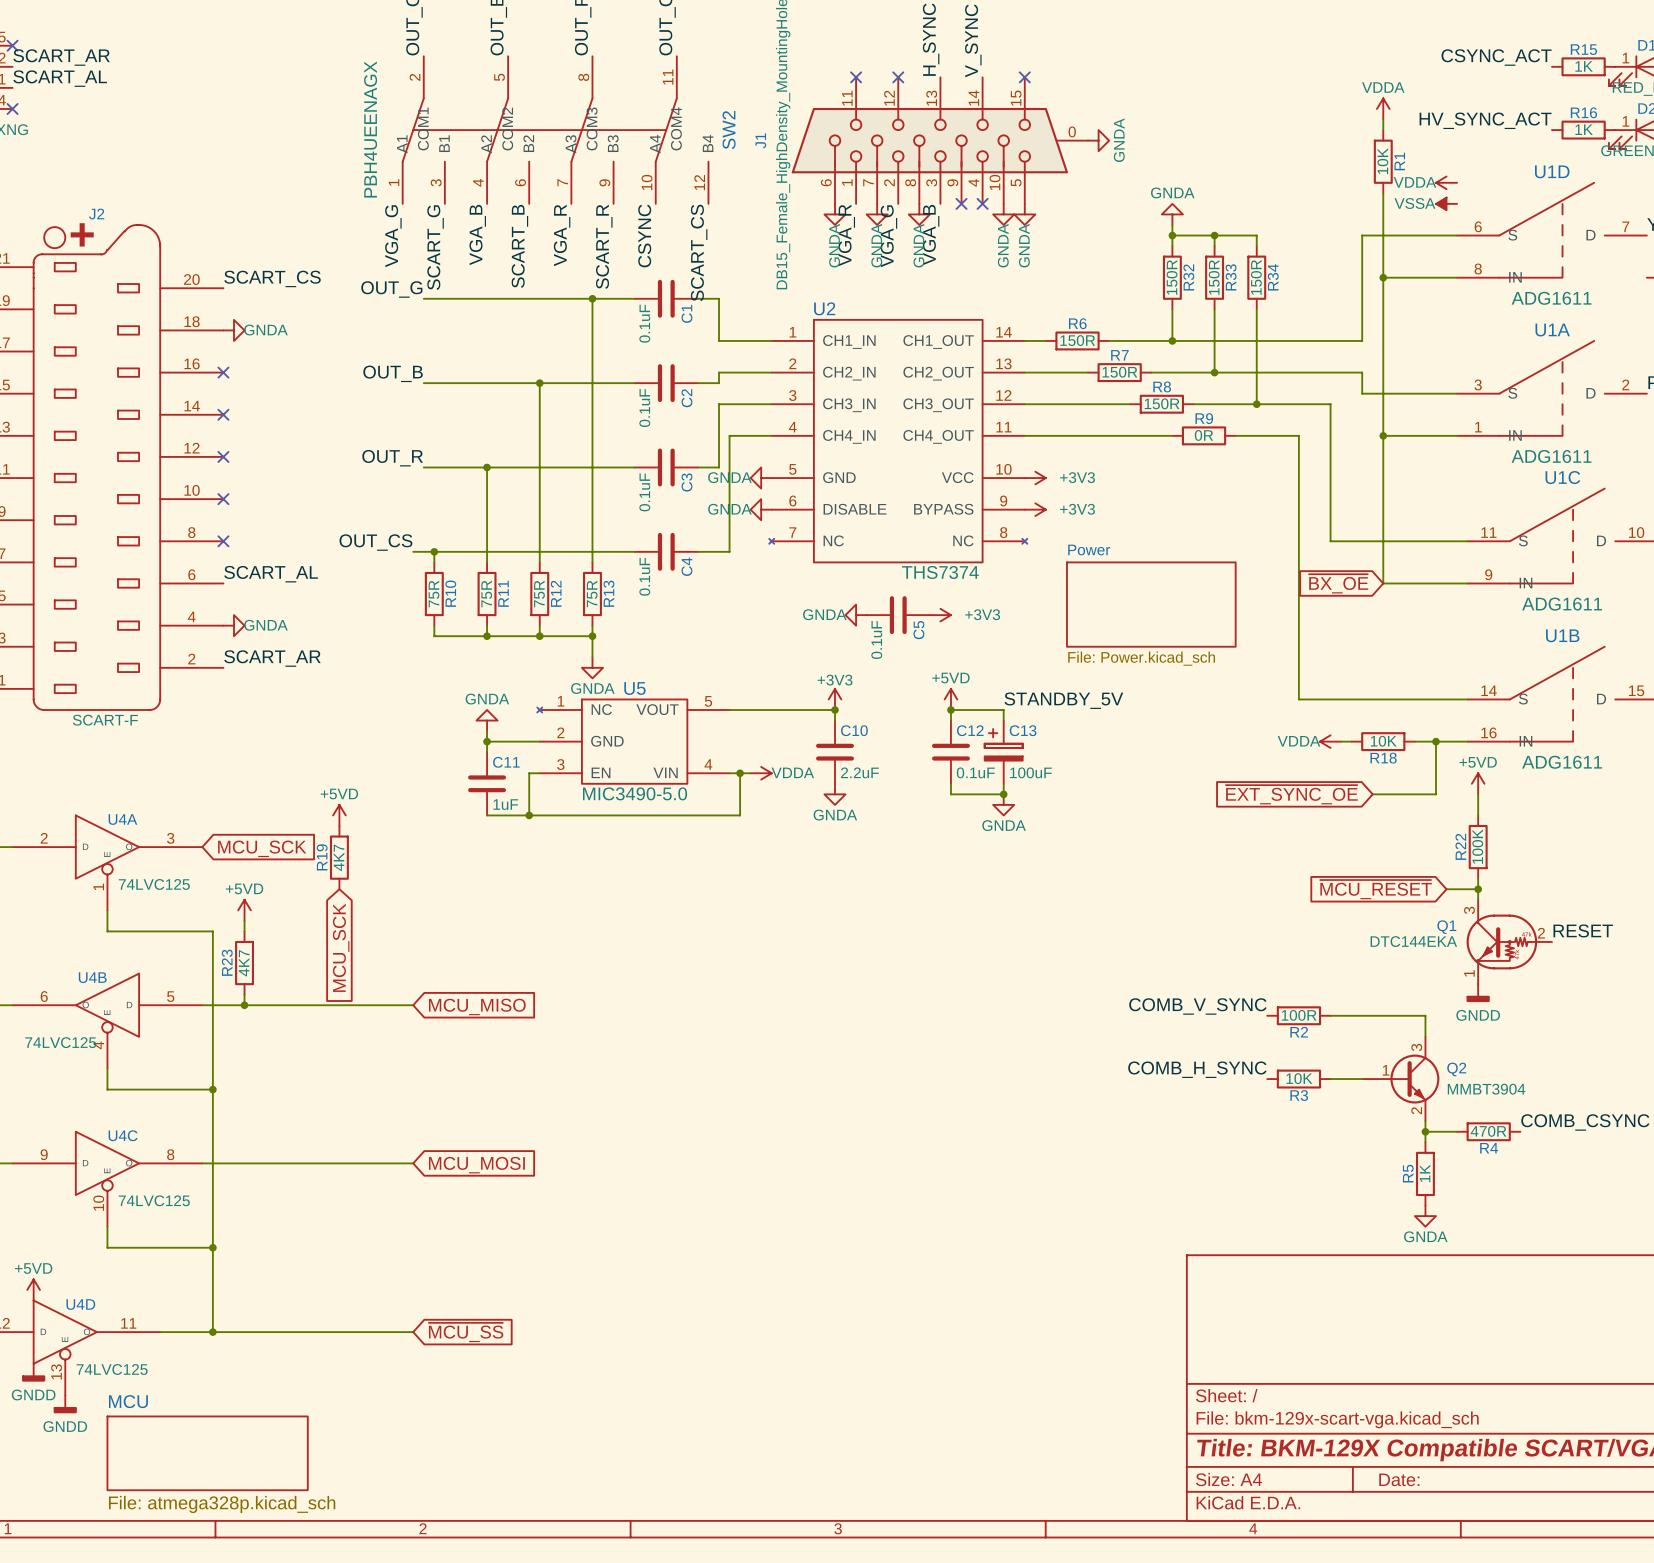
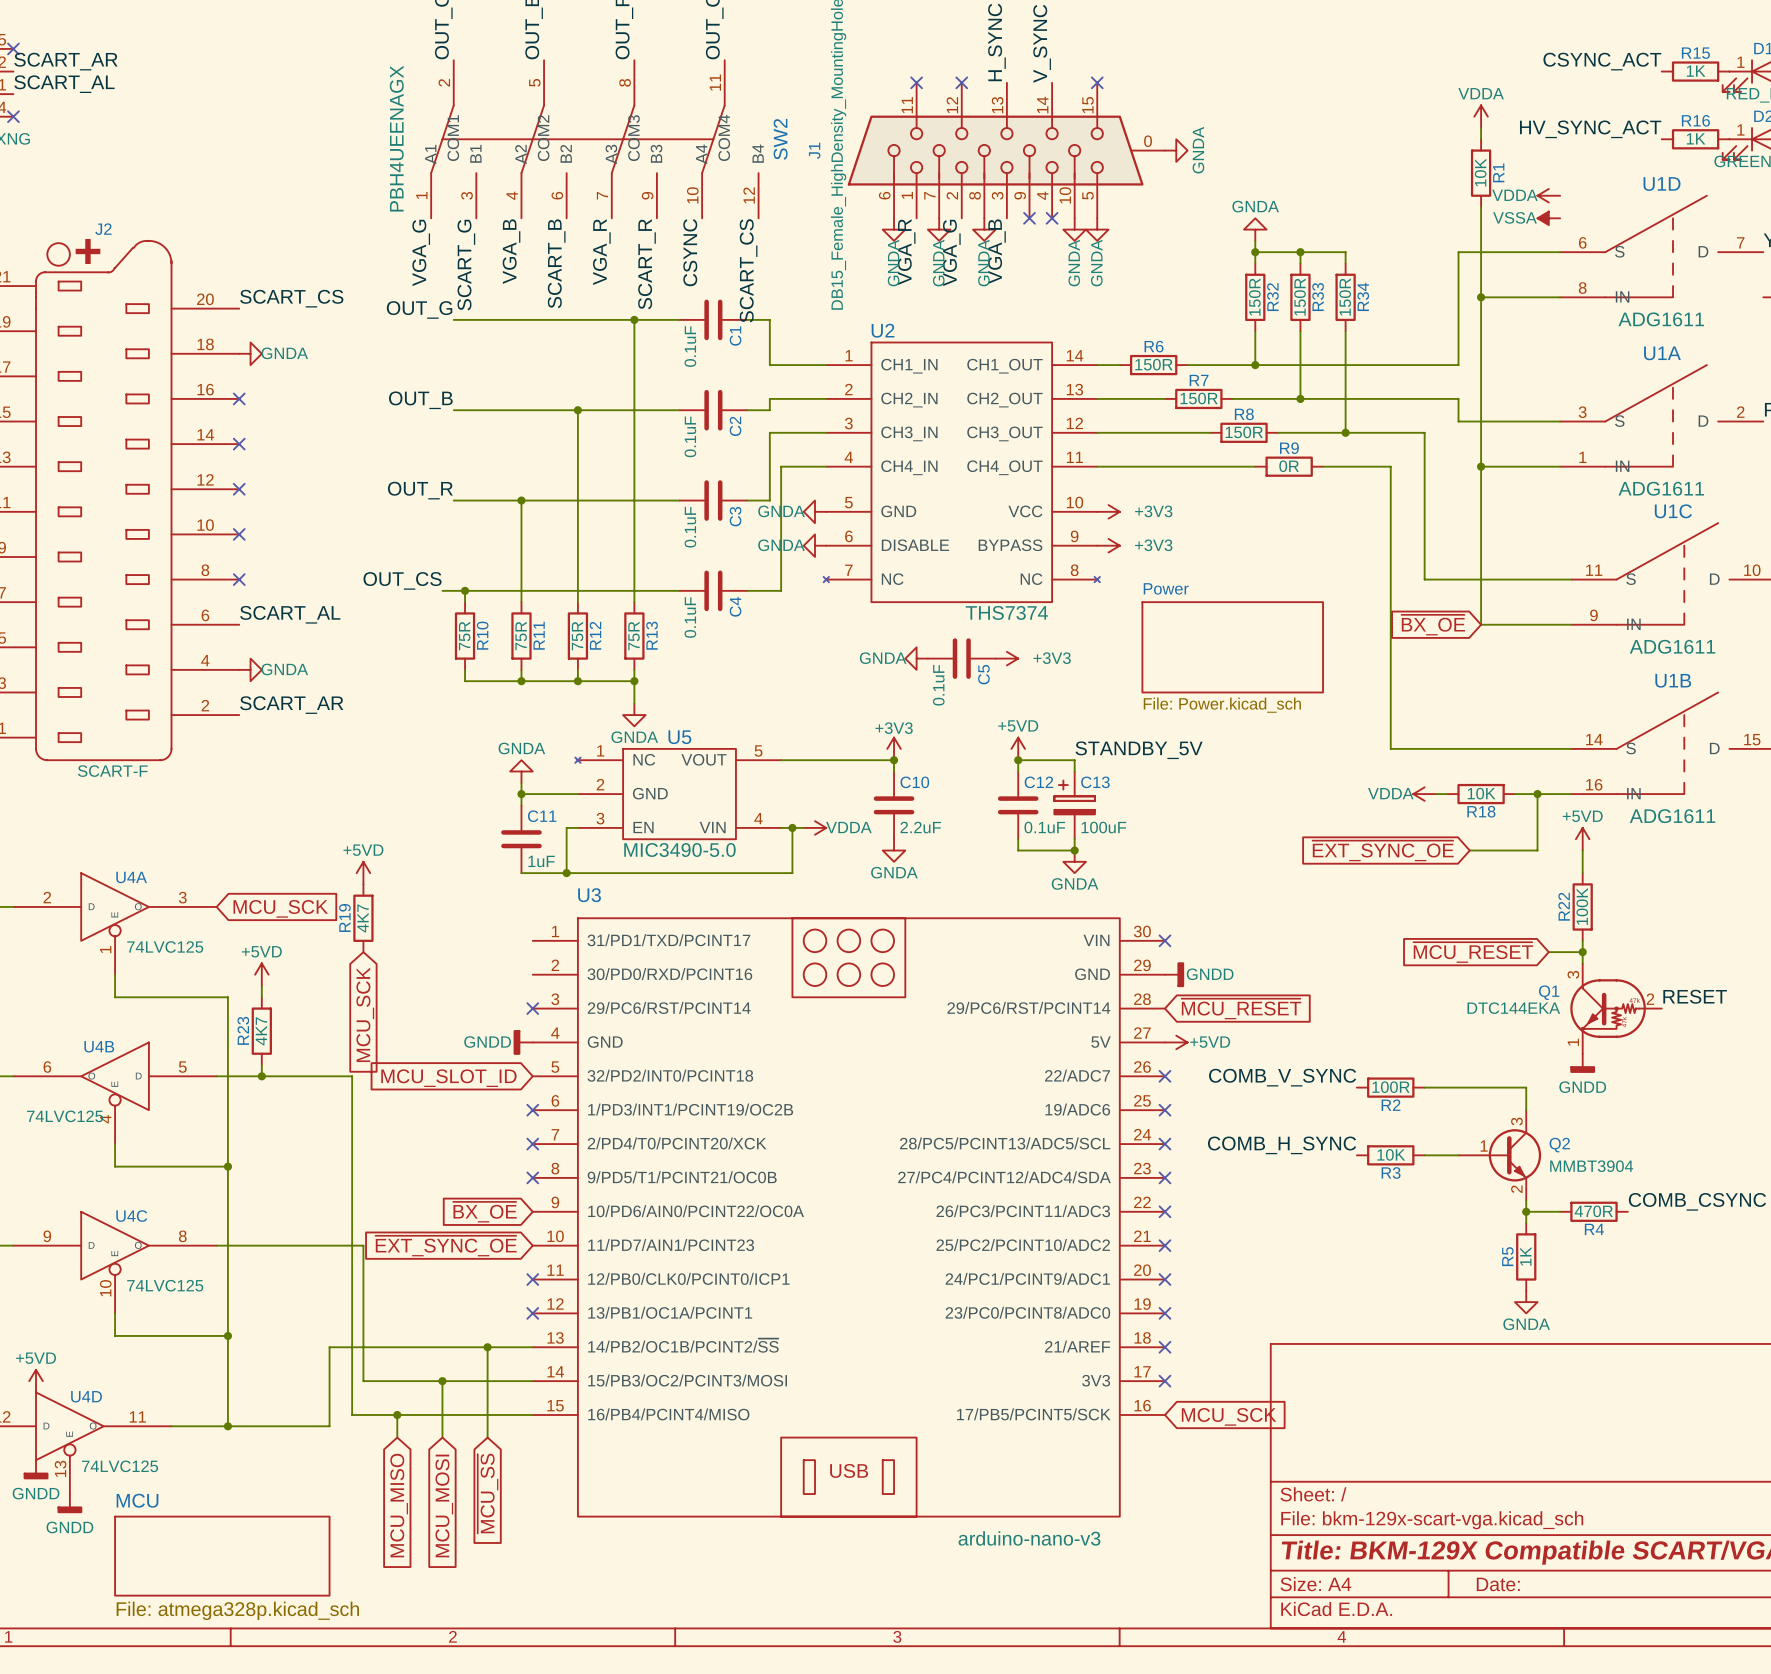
no-connect mark: none -> (1164, 940)
power symbol: none -> GNDD (1174, 974)
no-connect mark: none -> (532, 1008)
global label: none -> ~{MCU_RESET} (1241, 1008)
power symbol: none -> GNDD (523, 1042)
power symbol: none -> +5VD (1176, 1042)
wire: (328, 1005) (413, 1005) -> (352, 1076) (352, 1415) (532, 1415)
no-connect mark: none -> (1164, 1076)
global label: none -> MCU_SLOT_ID (448, 1078)
global label: MCU_MISO (477, 1006) -> none
no-connect mark: none -> (532, 1110)
no-connect mark: none -> (1164, 1110)
no-connect mark: none -> (532, 1144)
no-connect mark: none -> (1164, 1144)
no-connect mark: none -> (532, 1177)
no-connect mark: none -> (1164, 1177)
no-connect mark: none -> (1164, 1211)
global label: none -> ~{BX_OE} (484, 1212)
U3: none -> arduino-nano-v3 (848, 1217)
wire: (339, 1163) (413, 1163) -> (363, 1245) (363, 1381) (532, 1381)
global label: none -> ~{EXT_SYNC_OE} (446, 1246)
no-connect mark: none -> (1164, 1245)
global label rotation: 0° (476, 1165) -> 90° clockwise (444, 1505)
global label position: MCU_MOSI (476, 1165) -> MCU_MOSI (444, 1505)
no-connect mark: none -> (532, 1279)
no-connect mark: none -> (1164, 1279)
no-connect mark: none -> (532, 1313)
no-connect mark: none -> (1164, 1313)
wire: none -> (487, 1347) (487, 1437)
junction: none -> (487, 1347)
no-connect mark: none -> (1164, 1347)
wire: none -> (442, 1381) (442, 1437)
junction: none -> (442, 1381)
no-connect mark: none -> (1164, 1381)
wire: none -> (397, 1415) (397, 1437)
junction: none -> (397, 1415)
global label: none -> MCU_SCK (1229, 1416)
wire: (307, 1332) (413, 1332) -> (329, 1426) (329, 1347) (532, 1347)
global label rotation: 0° (466, 1332) -> 90° clockwise (488, 1493)
global label: none -> MCU_MISO (399, 1505)

